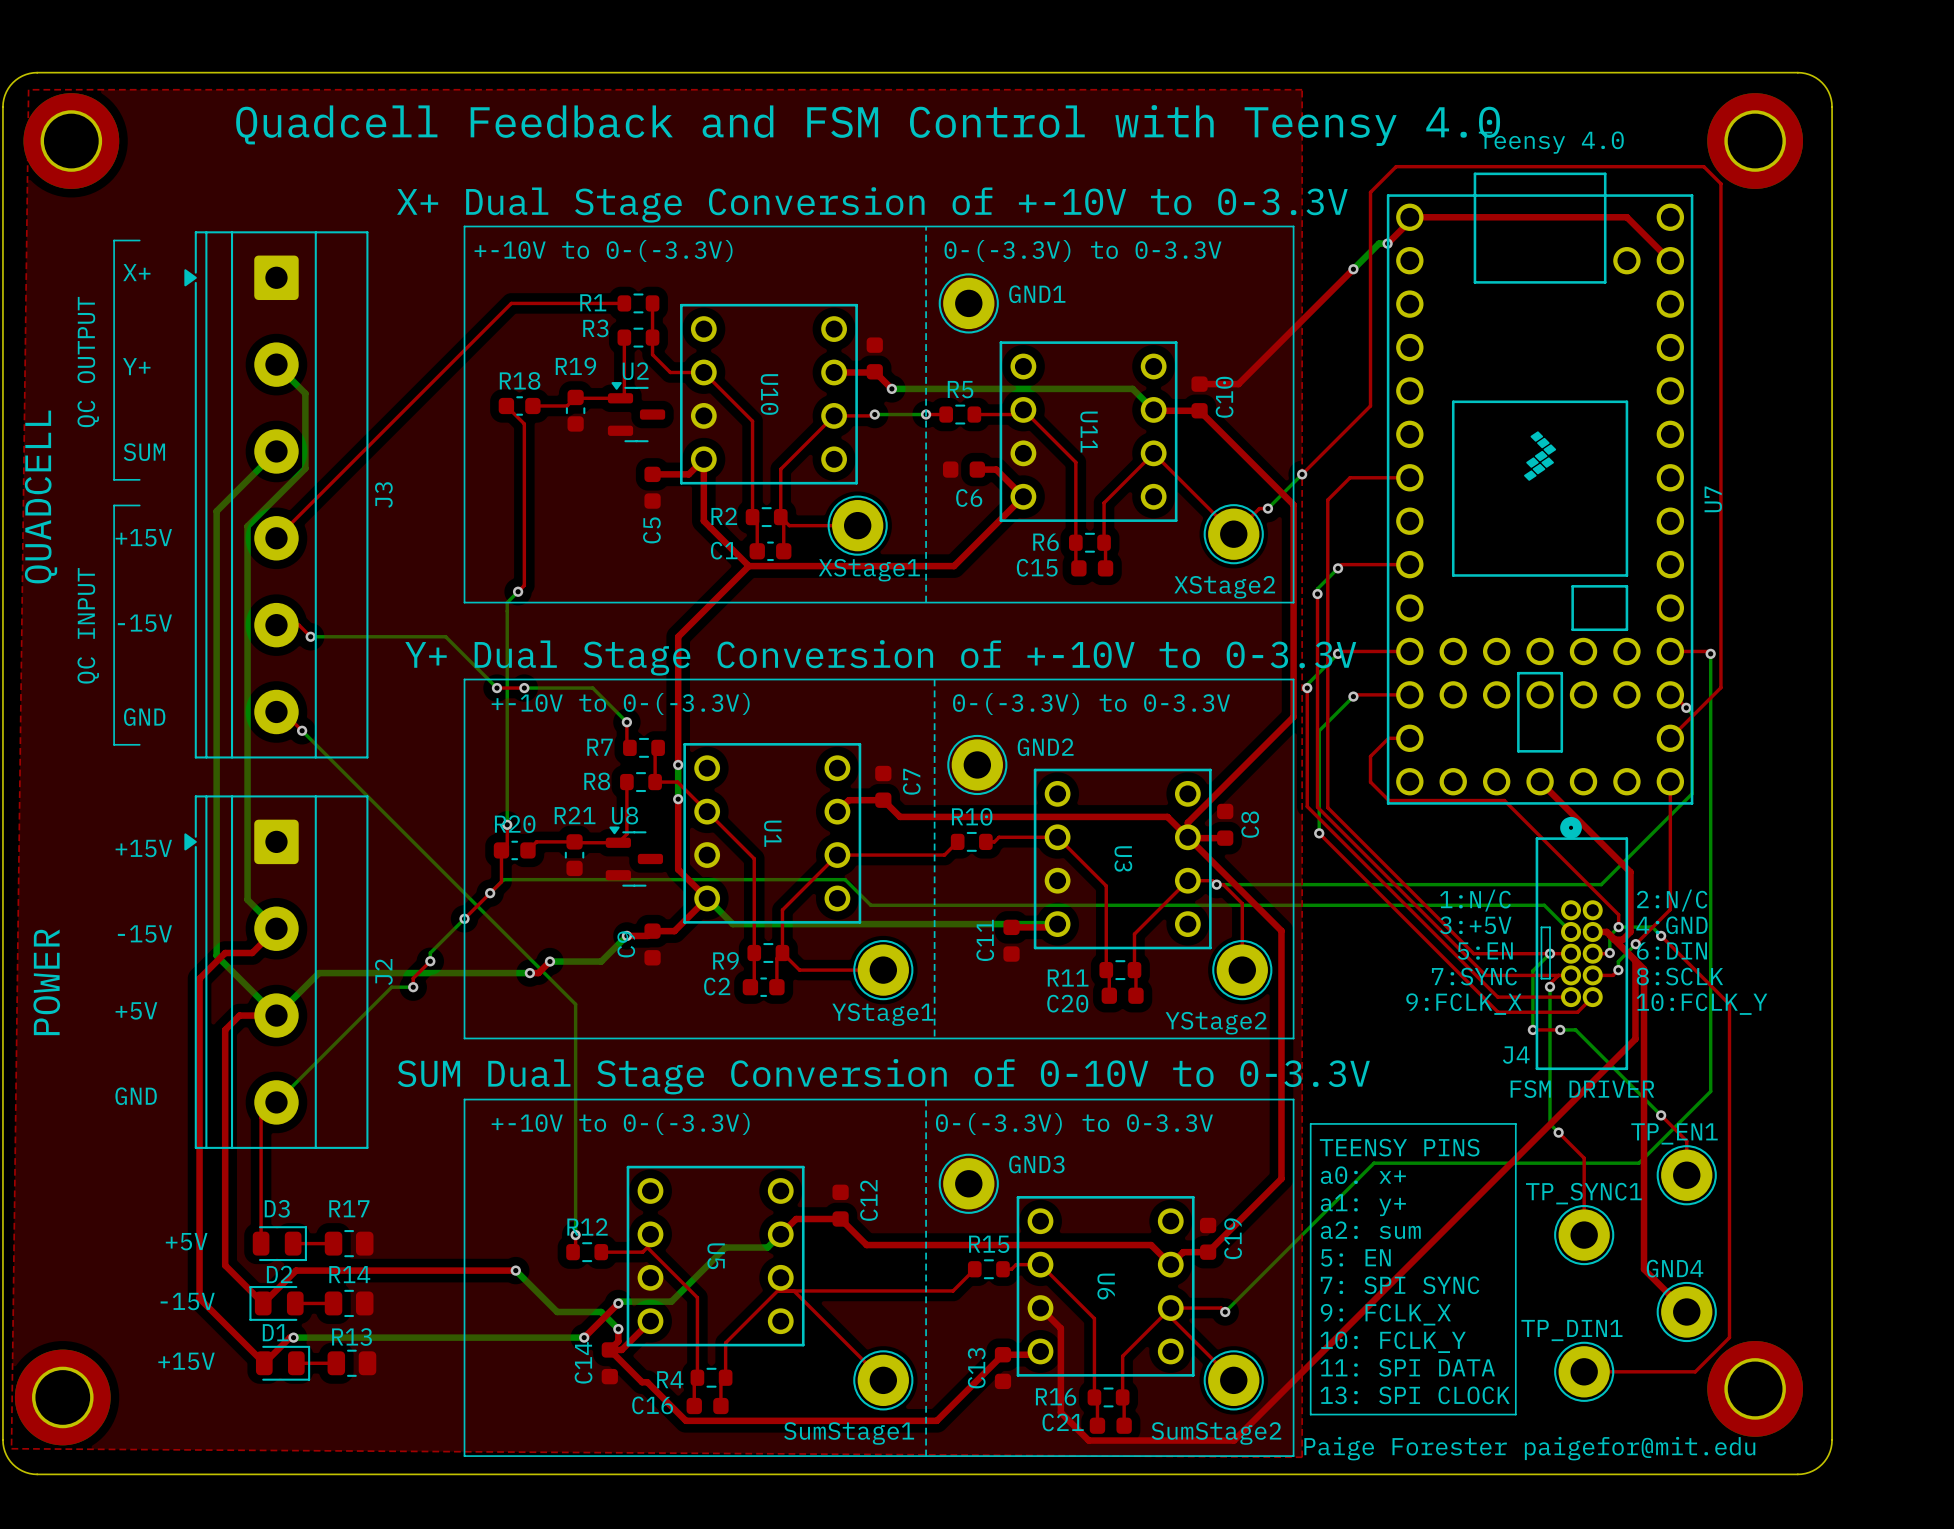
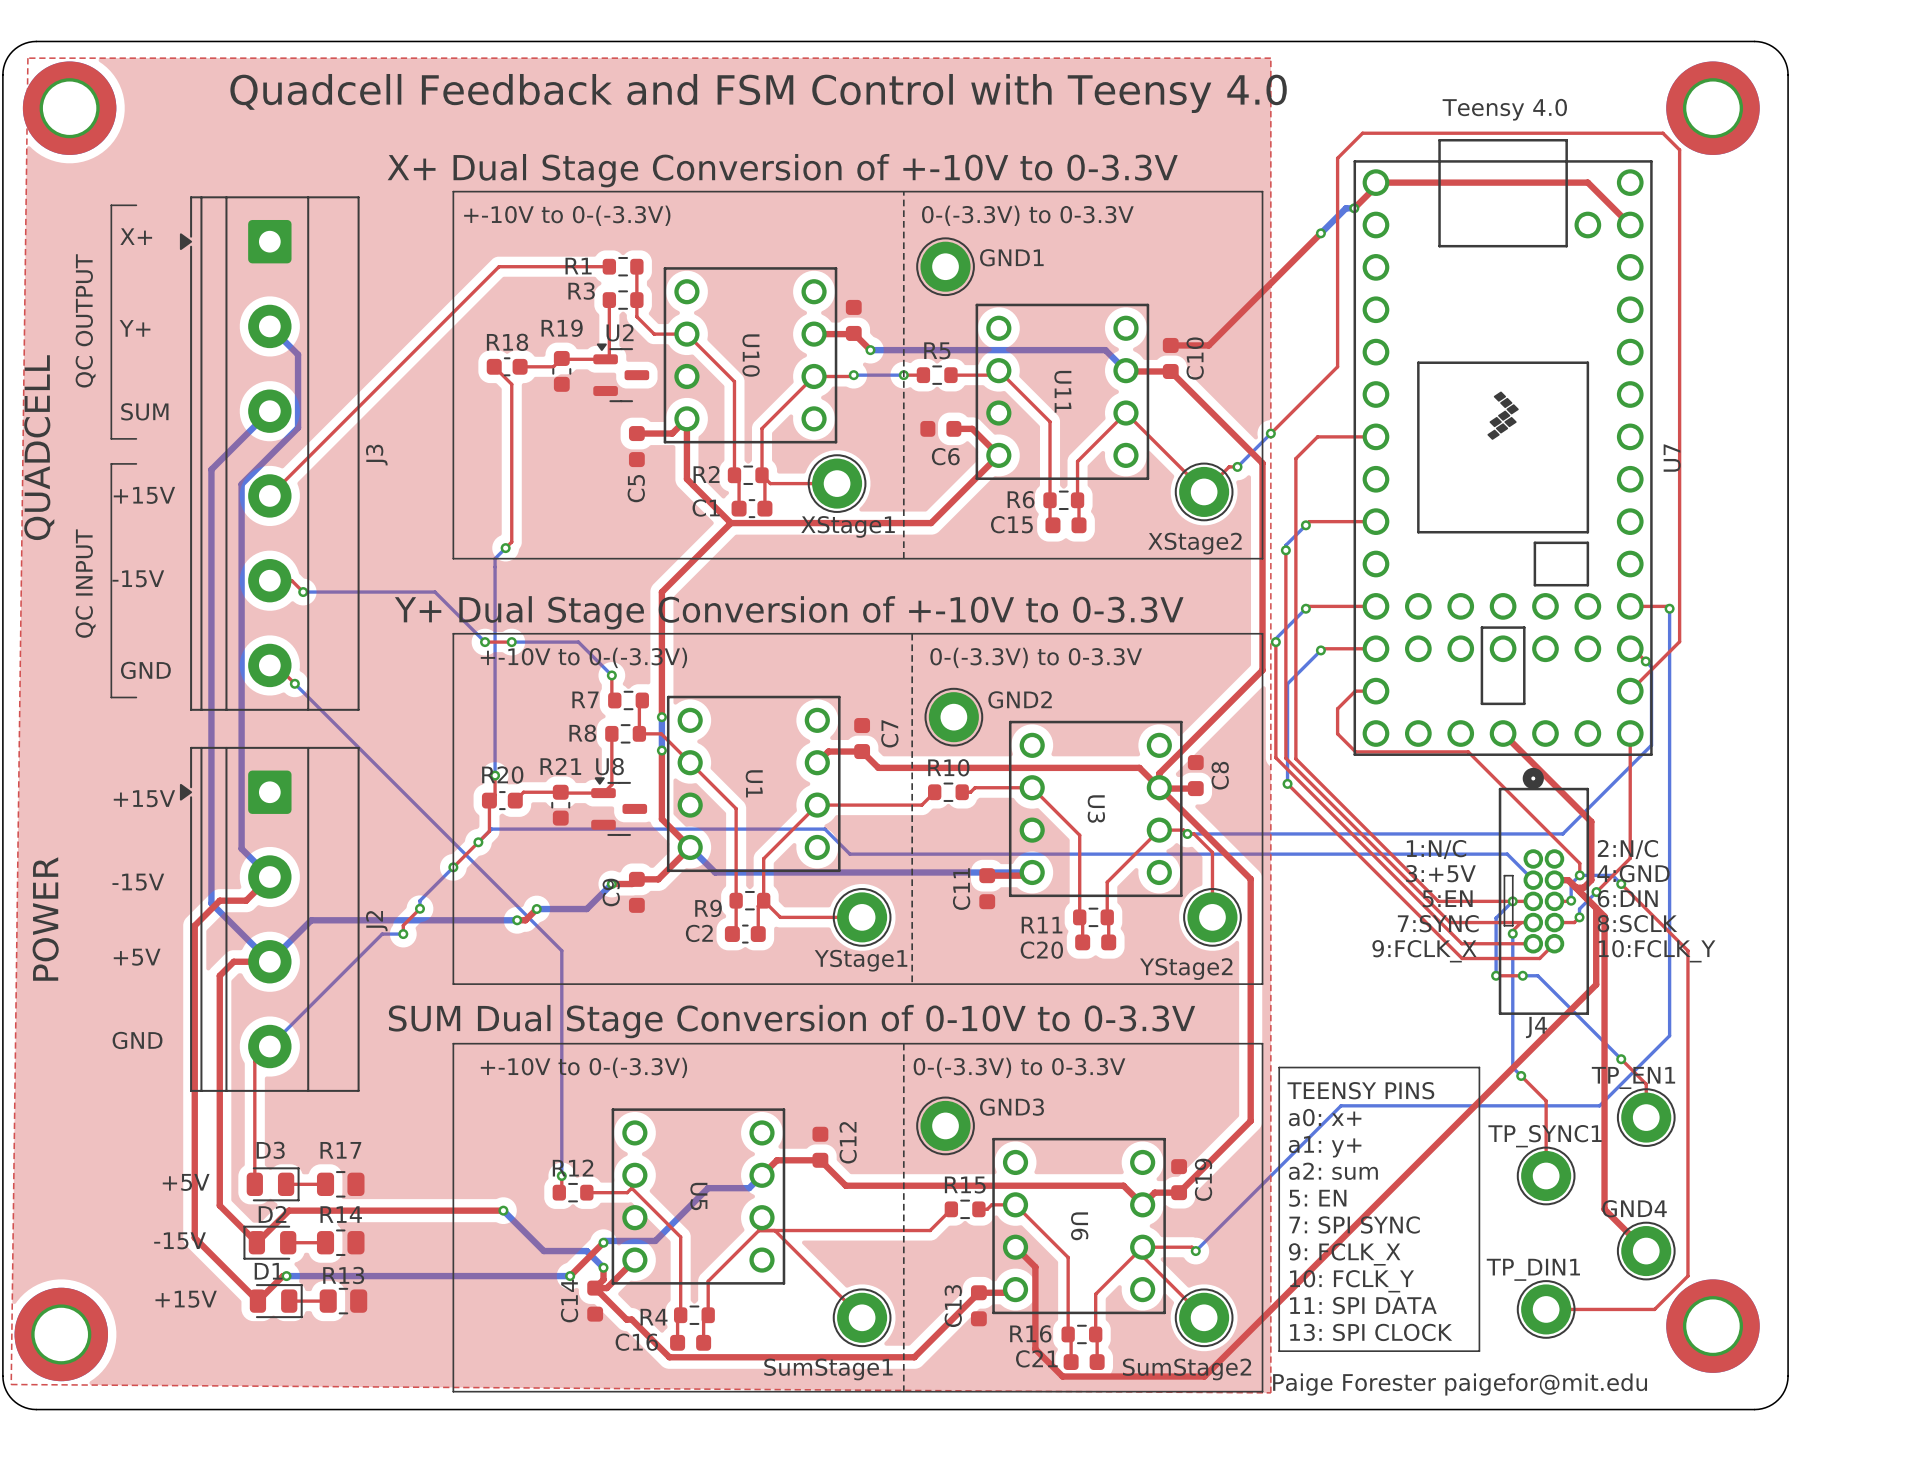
J4 name position: J4 (1516, 1055) -> J4 (1536, 1027)
J4 value: FSM DRIVER (1582, 1089) -> none

